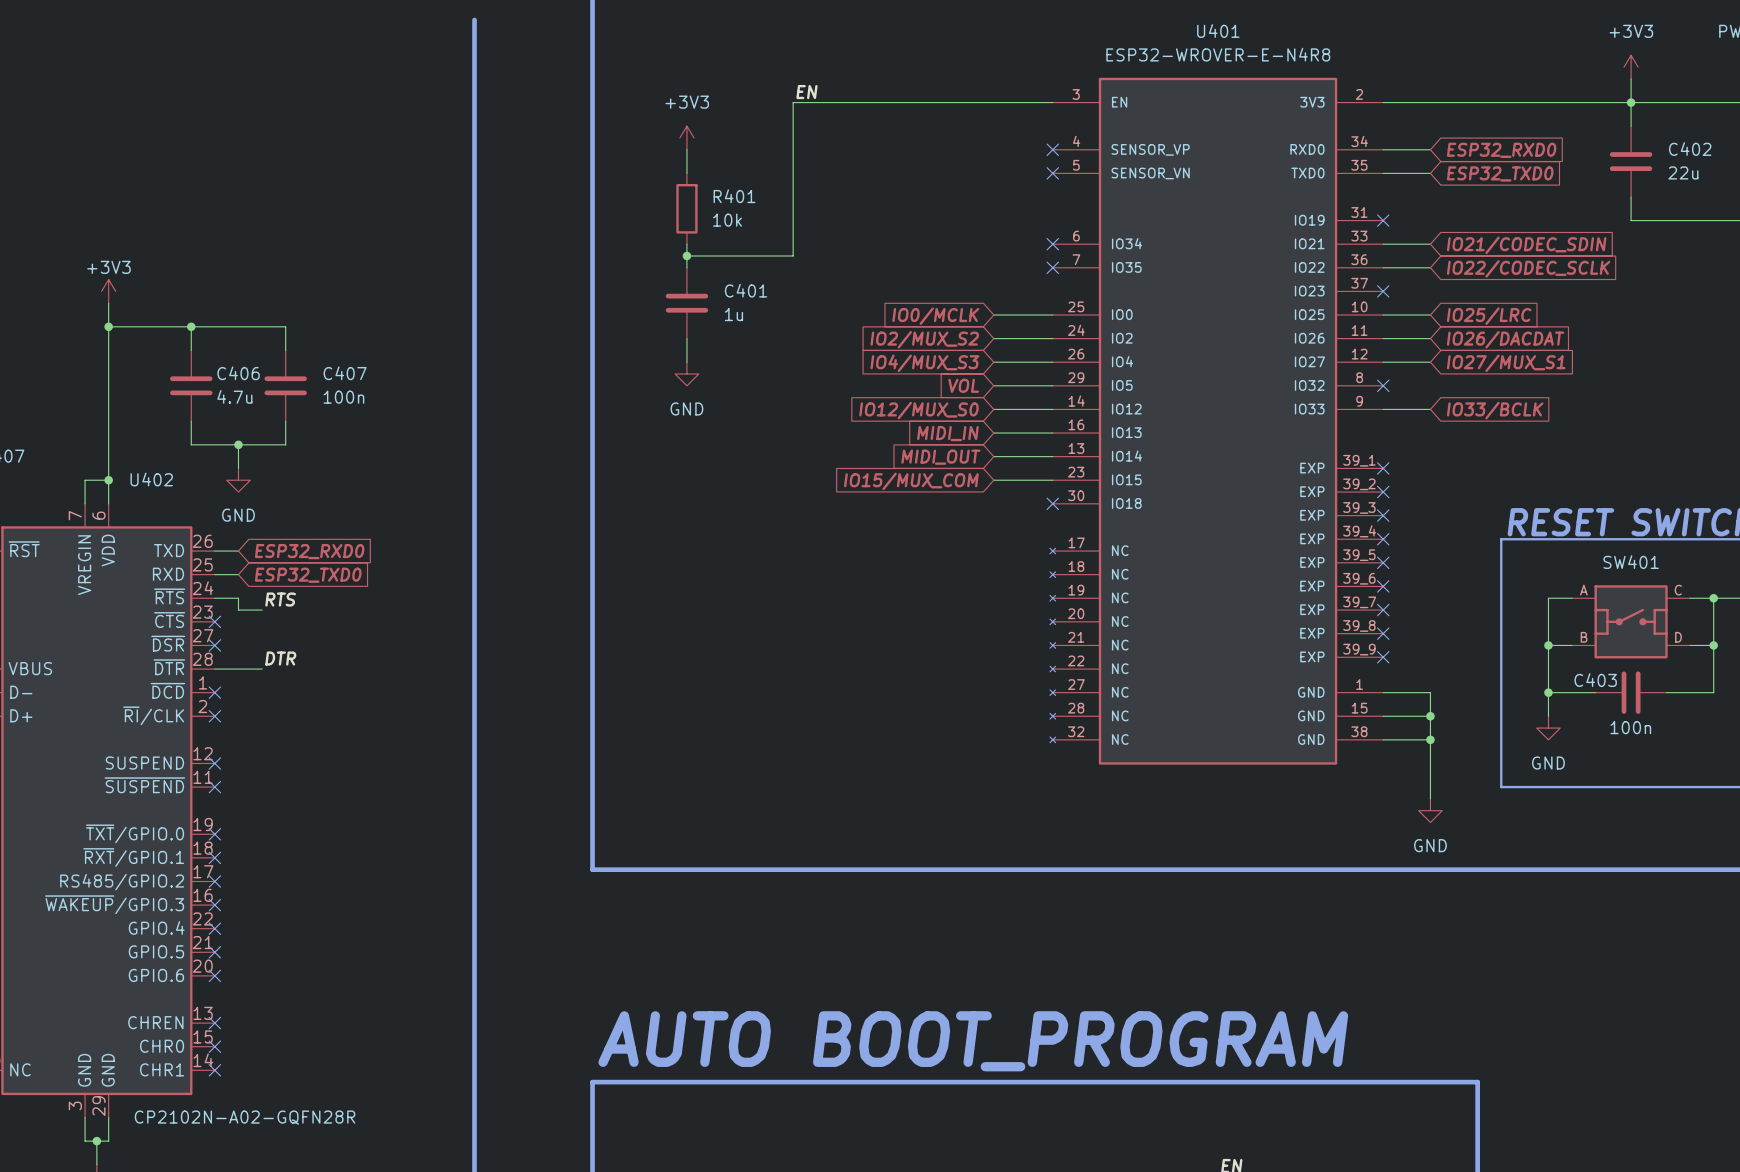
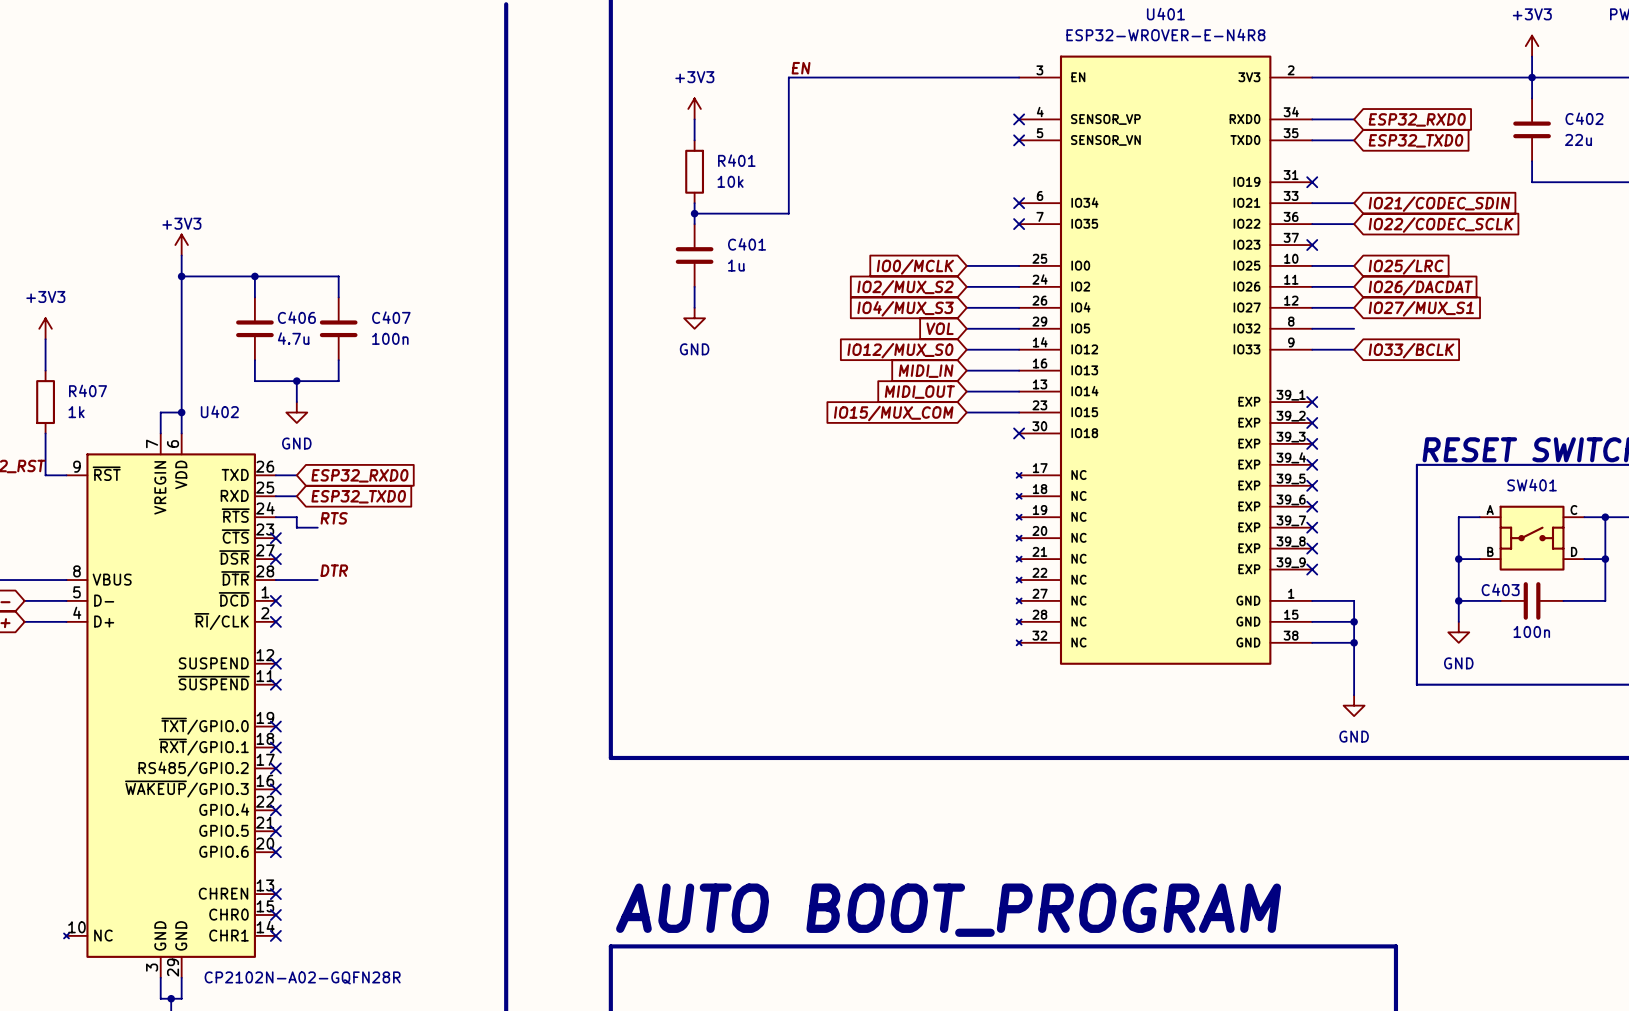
wire: none -> (1312, 328) (1354, 328)
no-connect mark: (1383, 385) -> none

